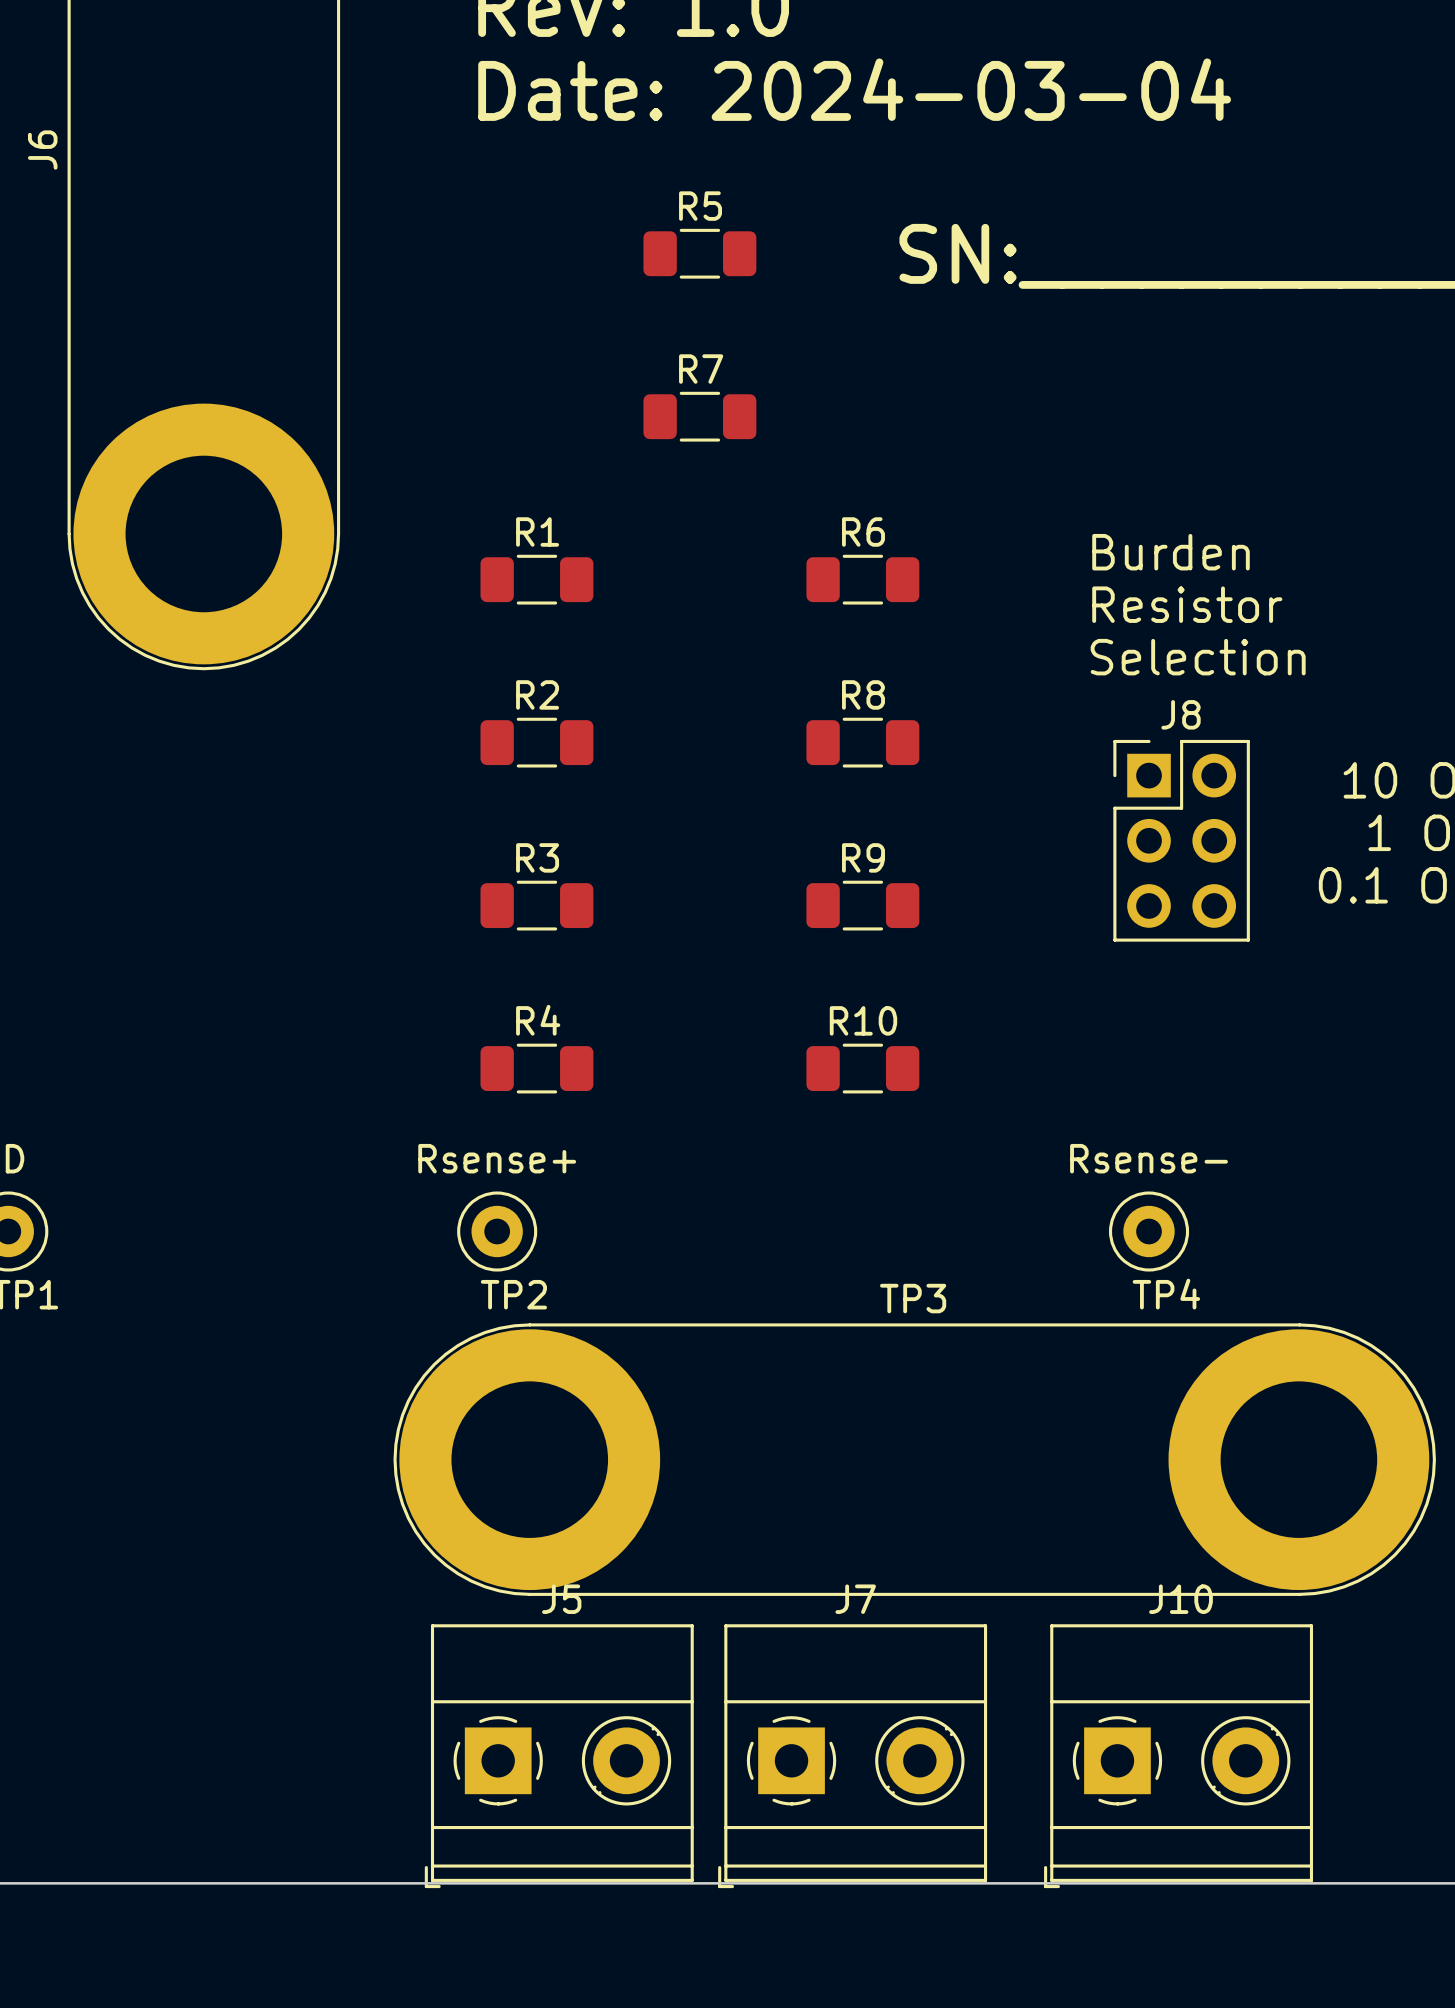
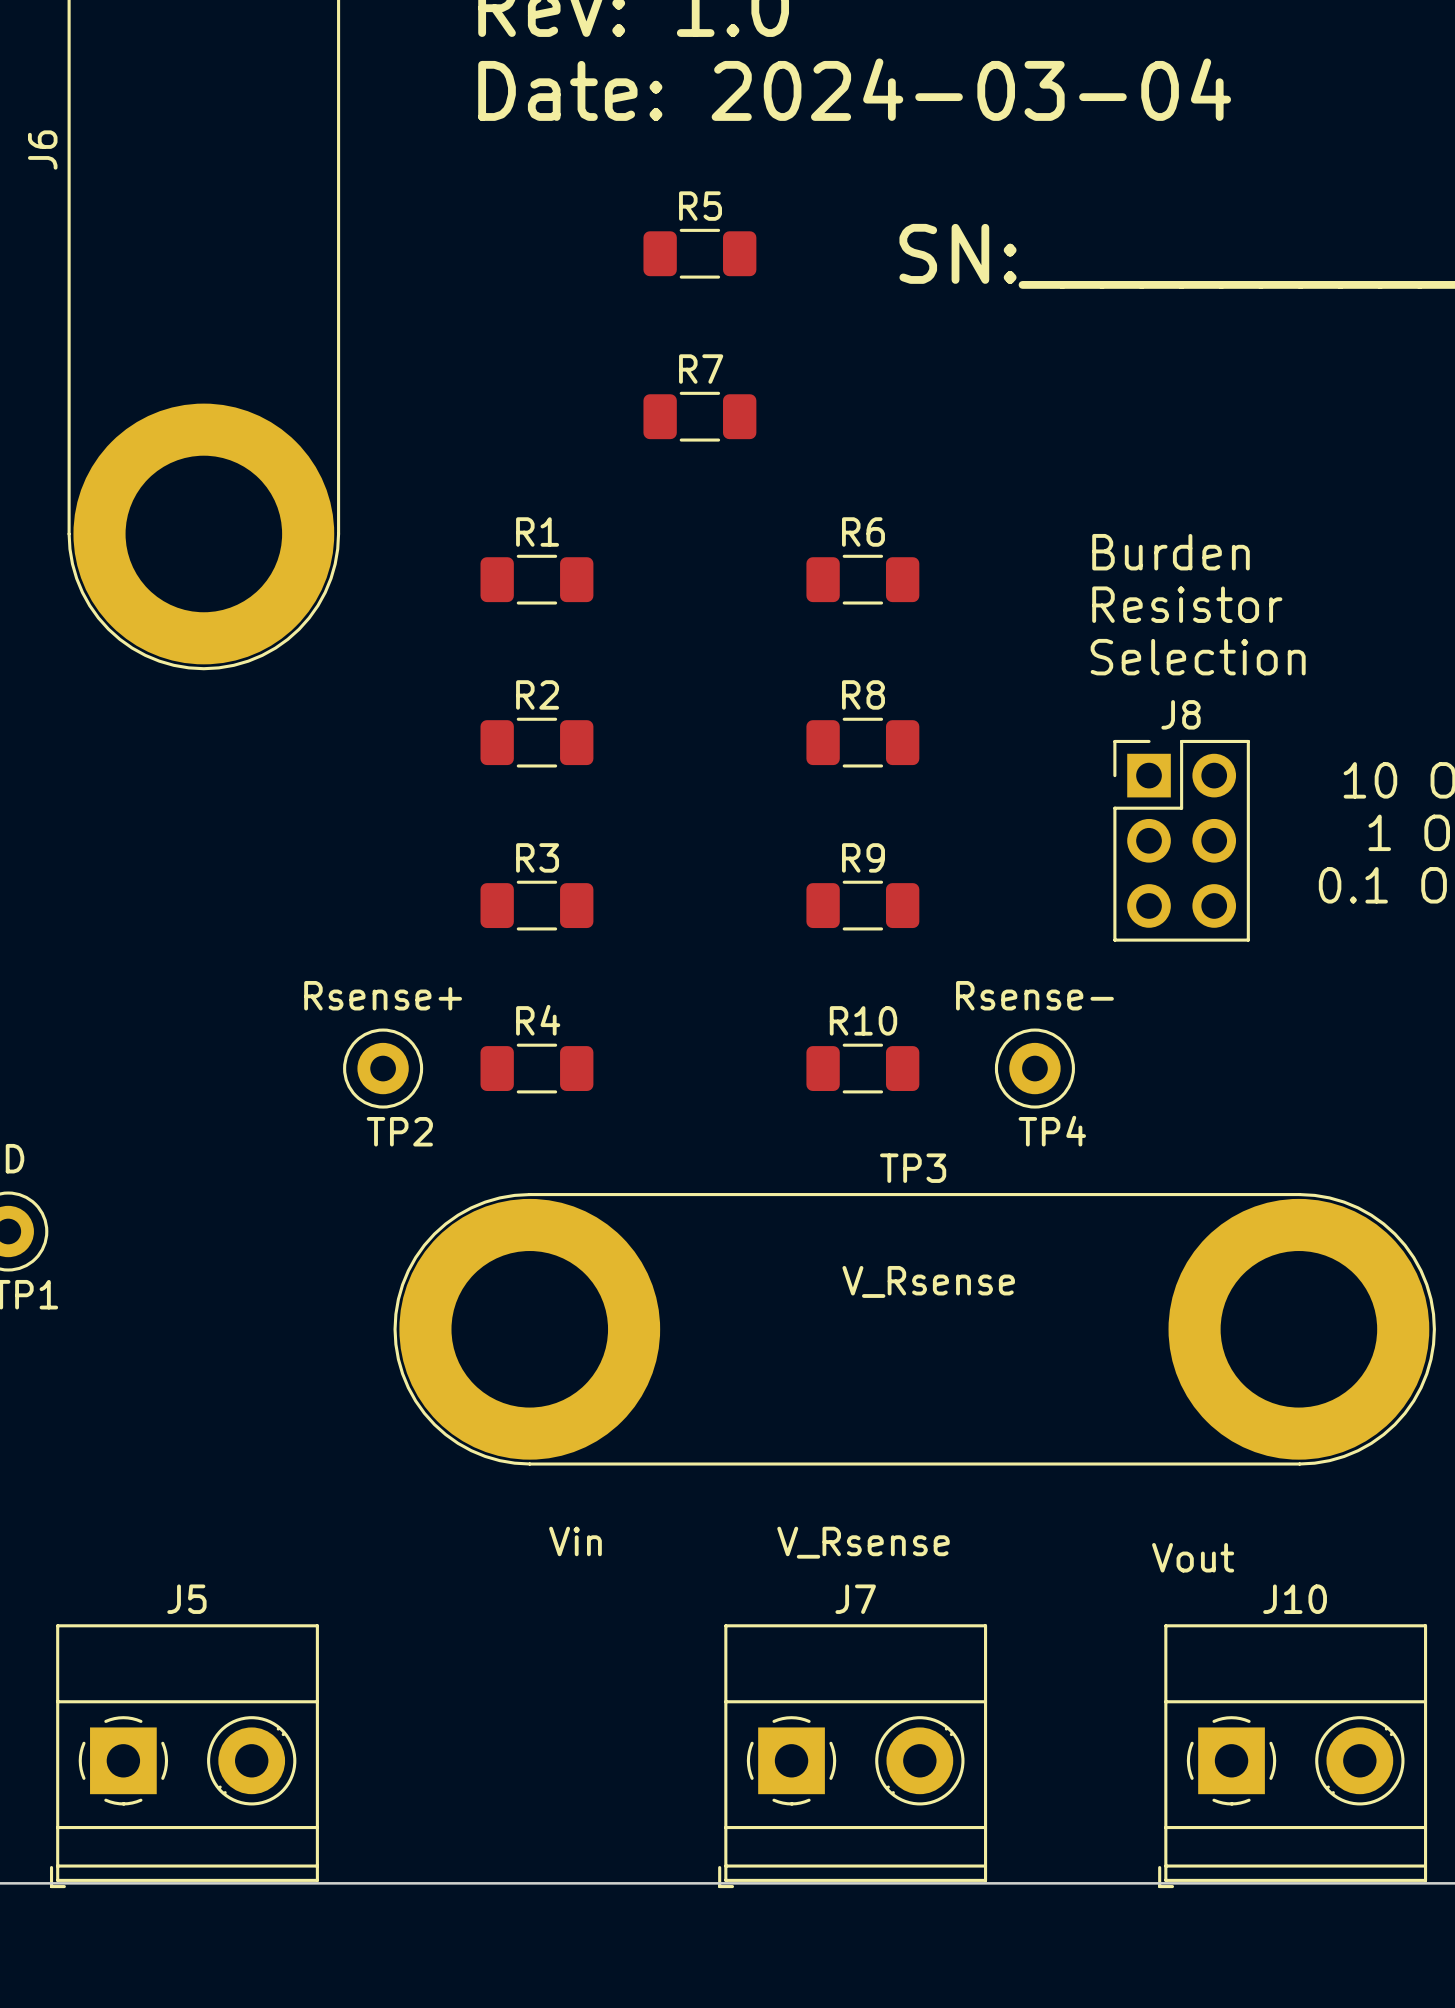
TP2 position: (497, 1231) -> (383, 1068)
TP4 position: (1149, 1231) -> (1034, 1068)
text: none -> V_Rsense (928, 1281)
TP3 position: (914, 1459) -> (914, 1329)
text: none -> Vin (575, 1541)
text: none -> V_Rsense (863, 1542)
text: none -> Vout (1193, 1557)
J5 position: (559, 1756) -> (184, 1756)
J10 position: (1178, 1756) -> (1292, 1756)

